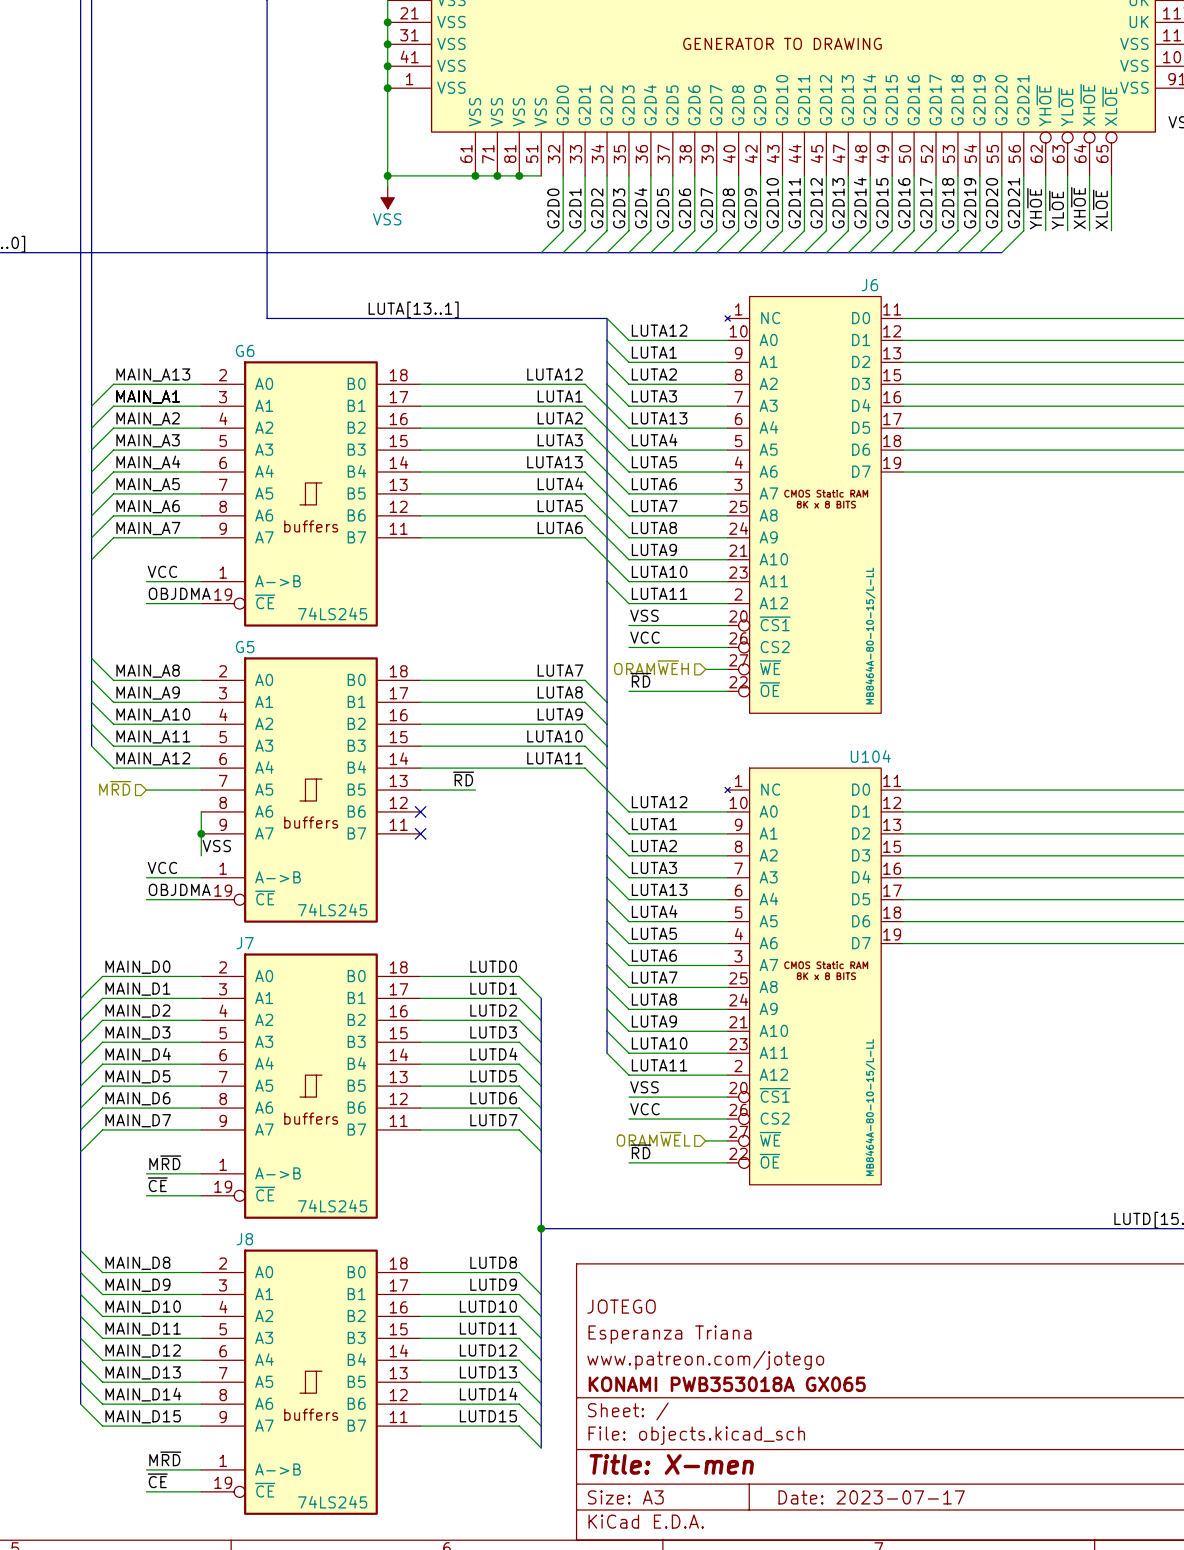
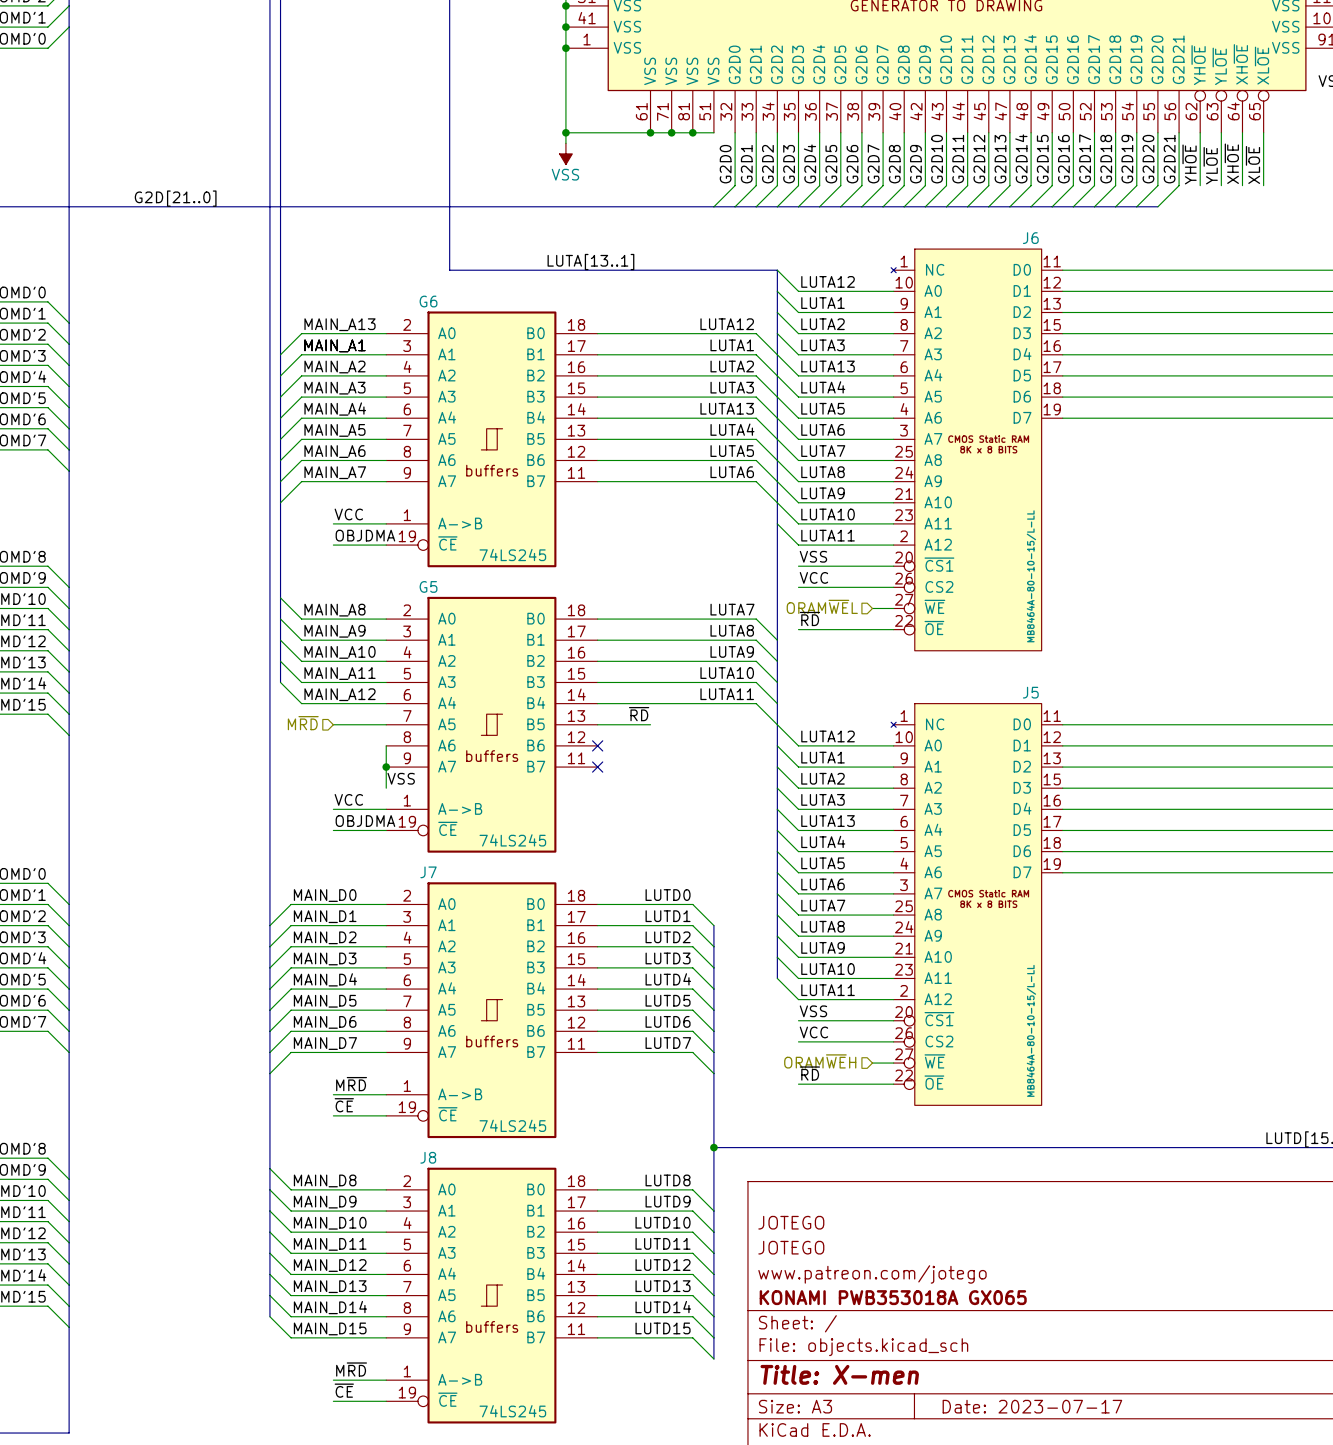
hierarchical label: ORAM~{WE}H (651, 667) -> ORAM~{WE}L (822, 606)
U104 name: U104 (870, 756) -> J5 (1030, 692)
hierarchical label: ORAM~{WE}L (653, 1139) -> ORAM~{WE}H (820, 1061)
title block: Esperanza Triana (669, 1334) -> JOTEGO (791, 1247)

